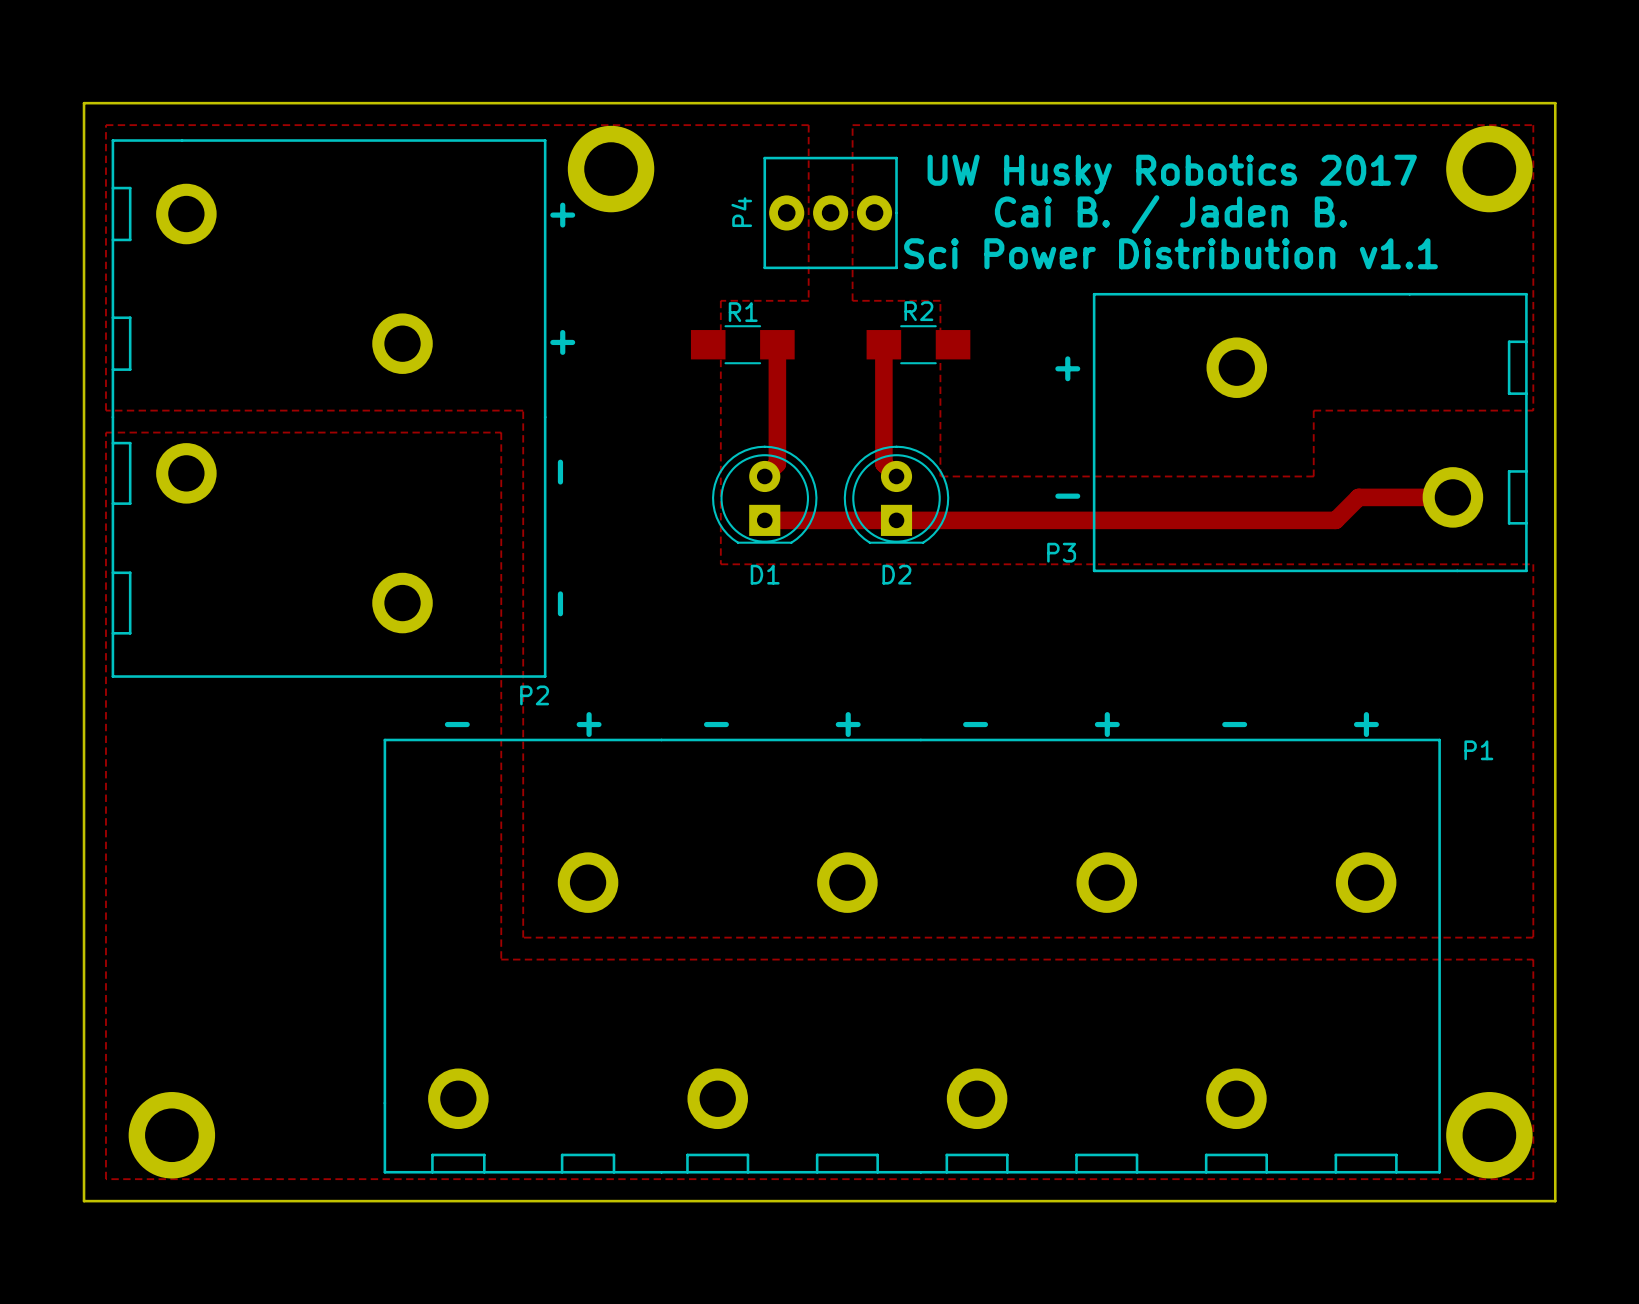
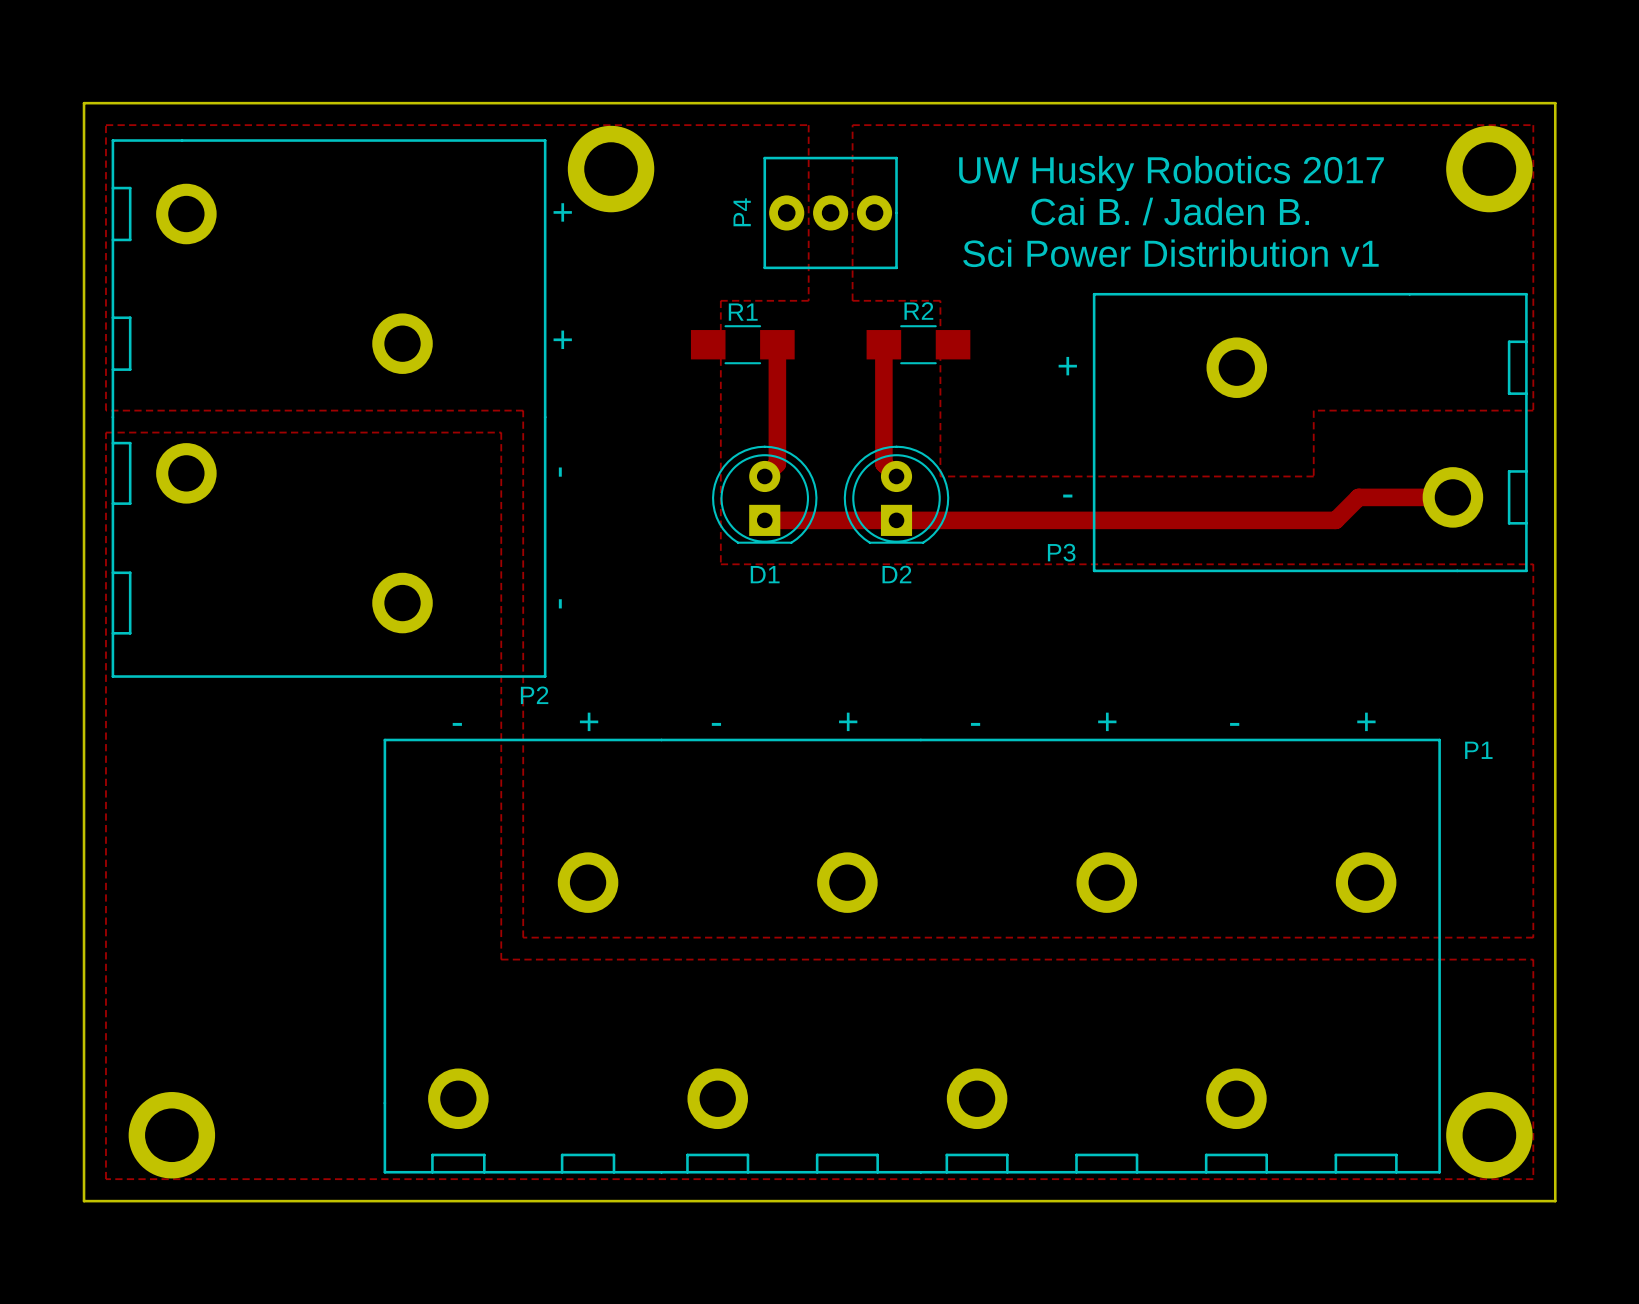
text: Sci Power Distribution v1.1 (1170, 253) -> Sci Power Distribution v1 (1170, 253)

